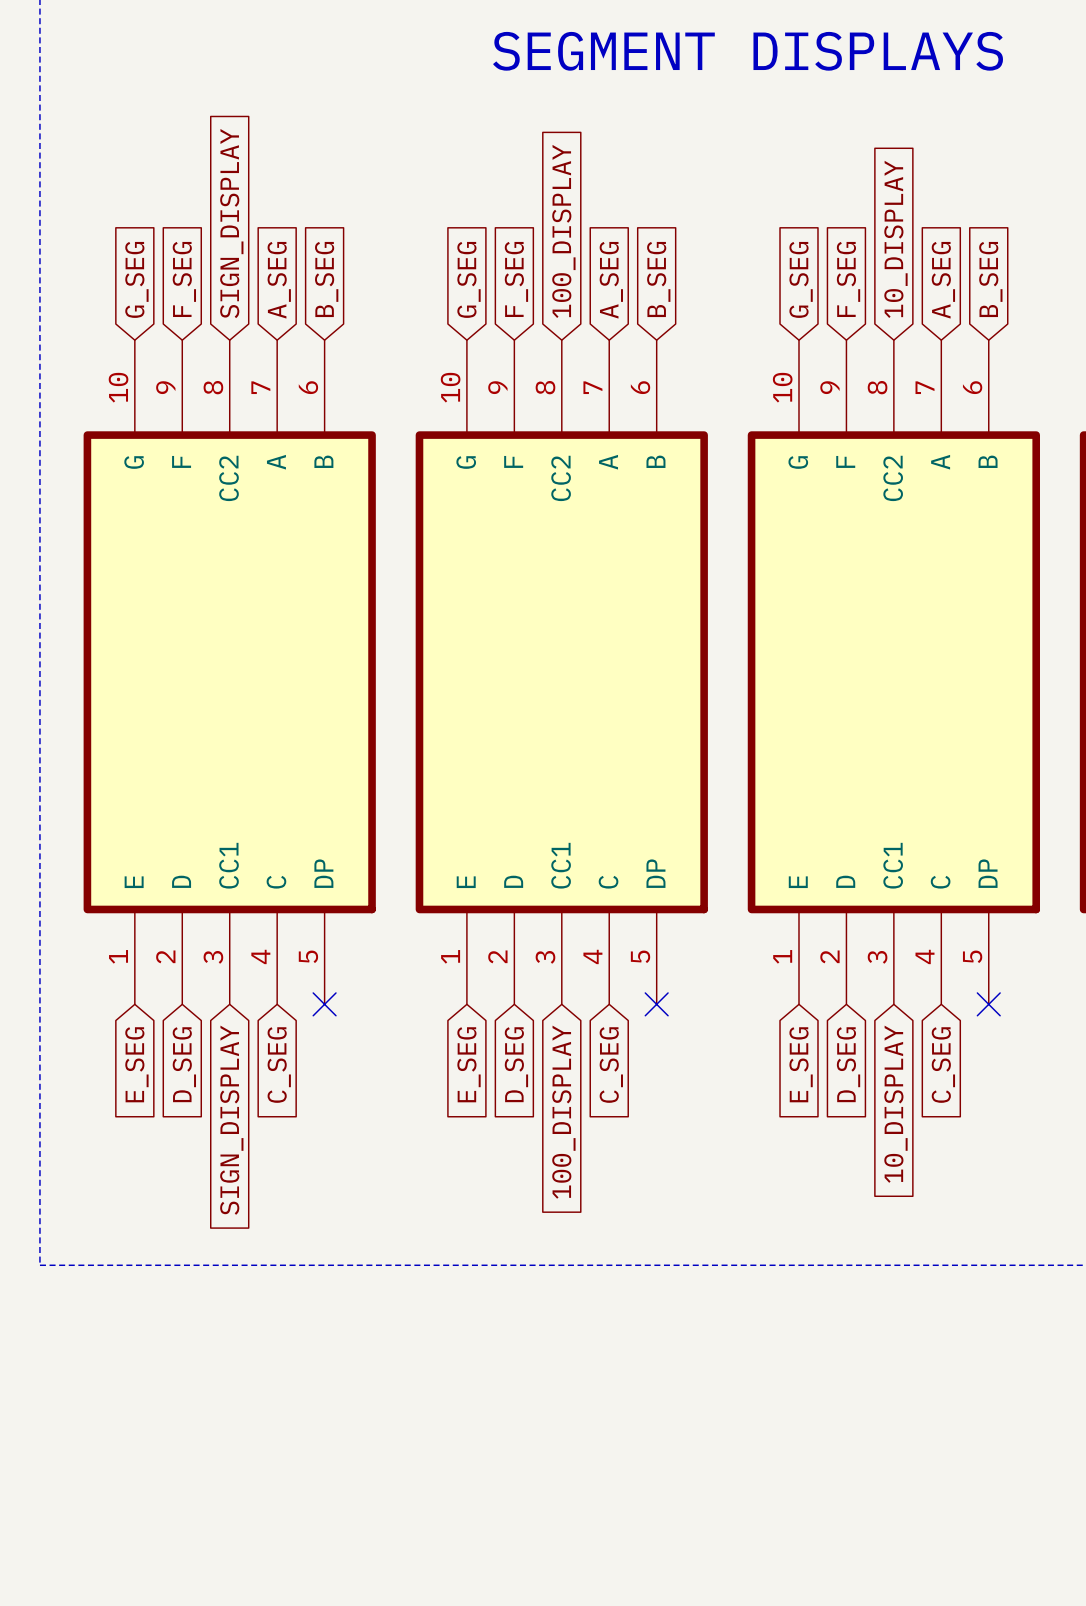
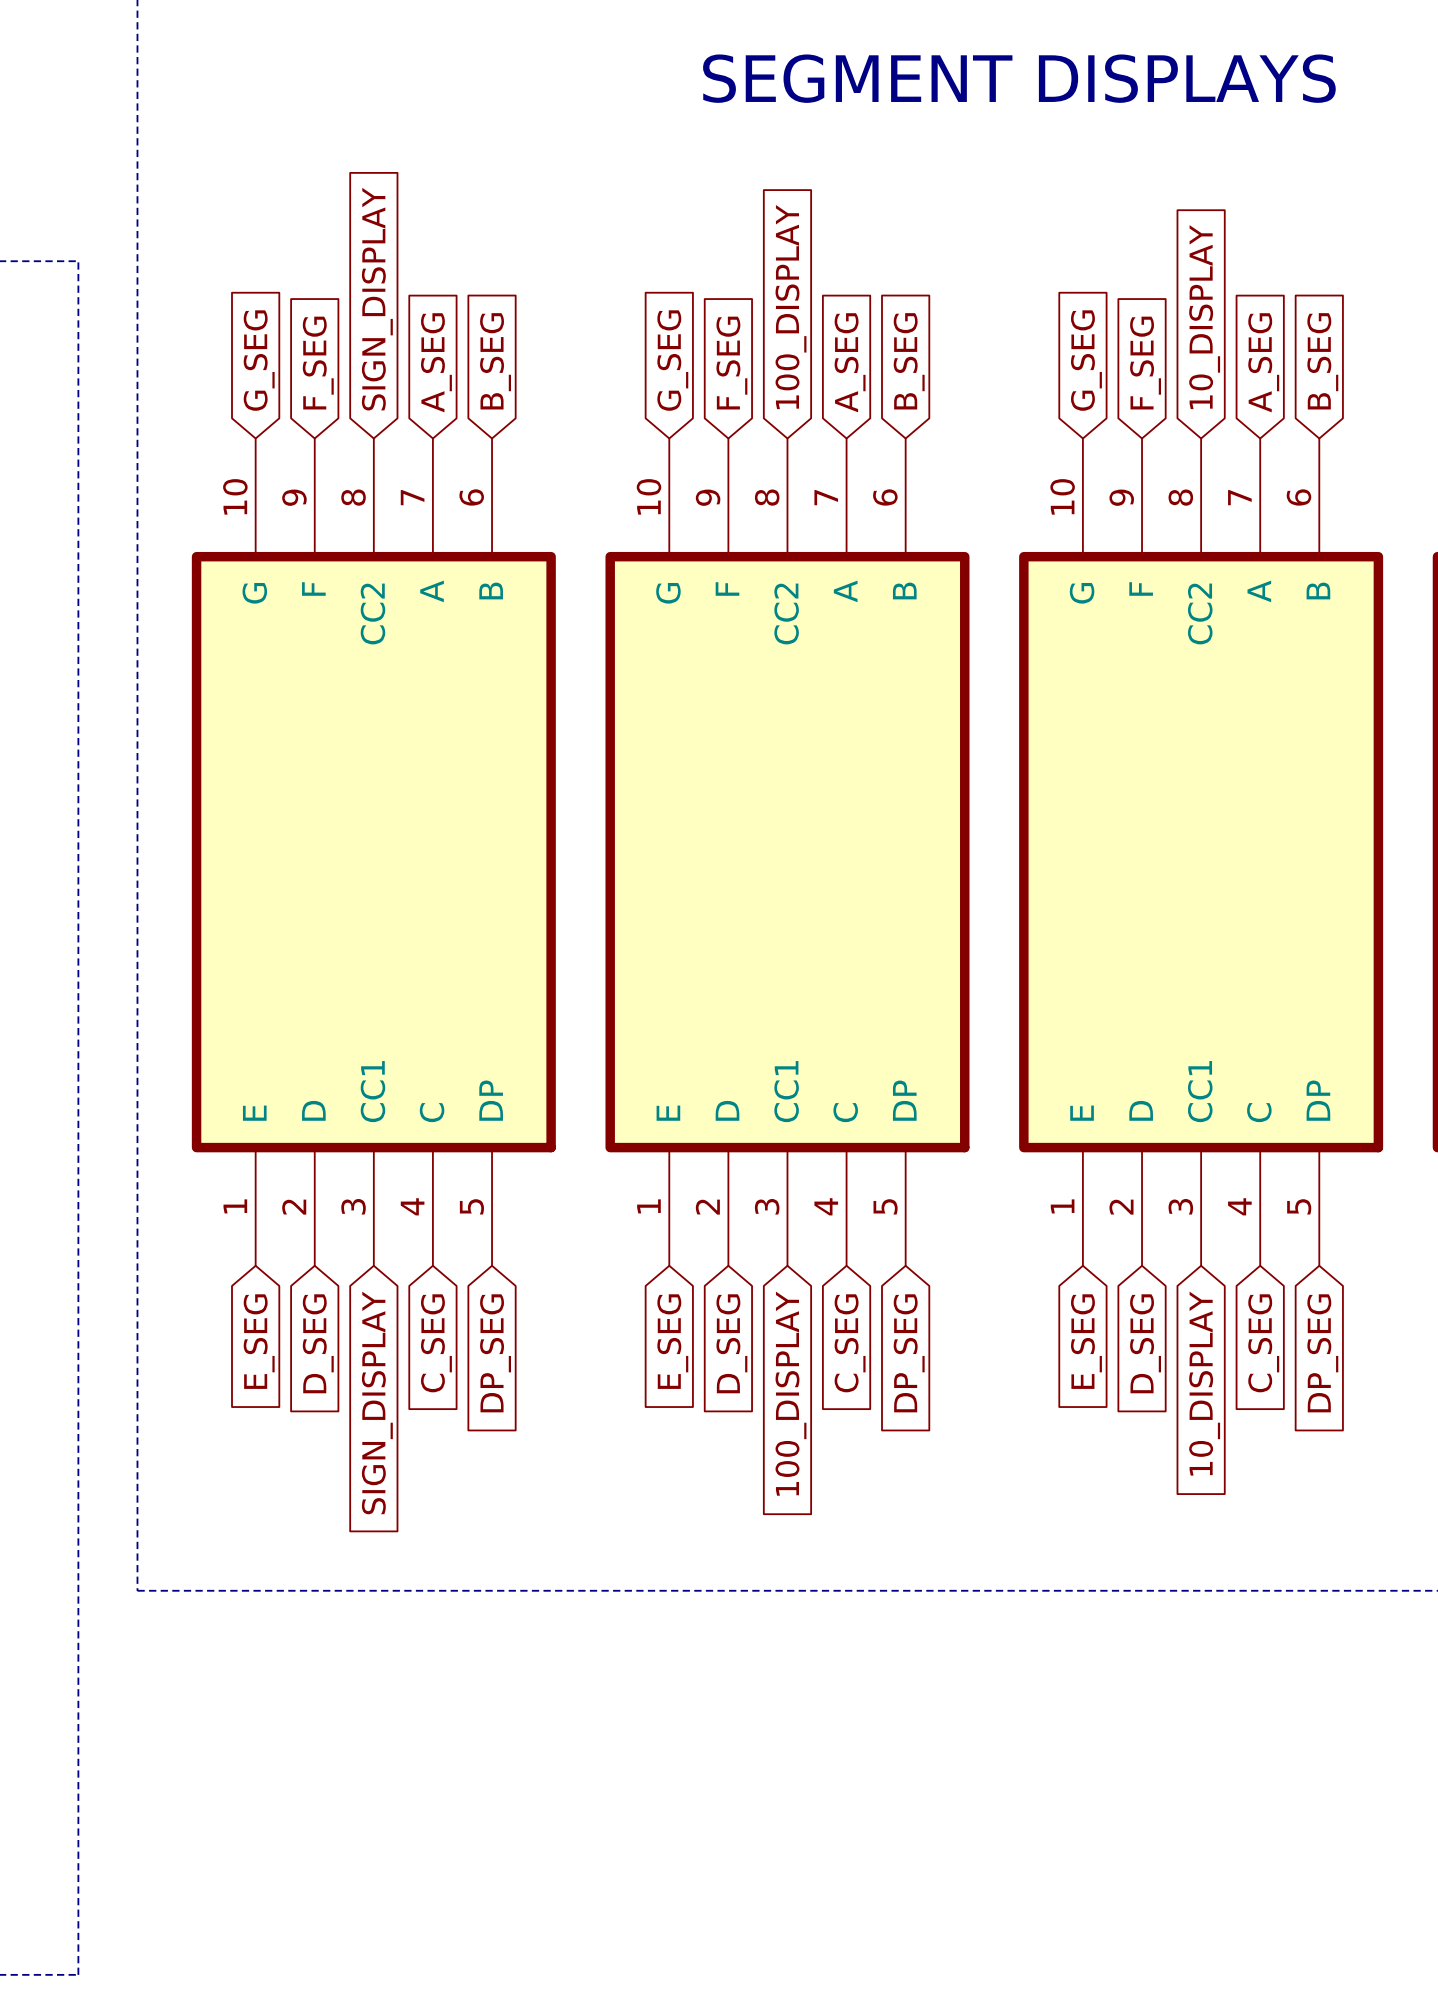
no-connect mark: (324, 1004) -> none
no-connect mark: (656, 1004) -> none
no-connect mark: (988, 1004) -> none
global label: none -> DP_SEG (495, 1353)
global label: none -> DP_SEG (909, 1353)
global label: none -> DP_SEG (1322, 1353)

